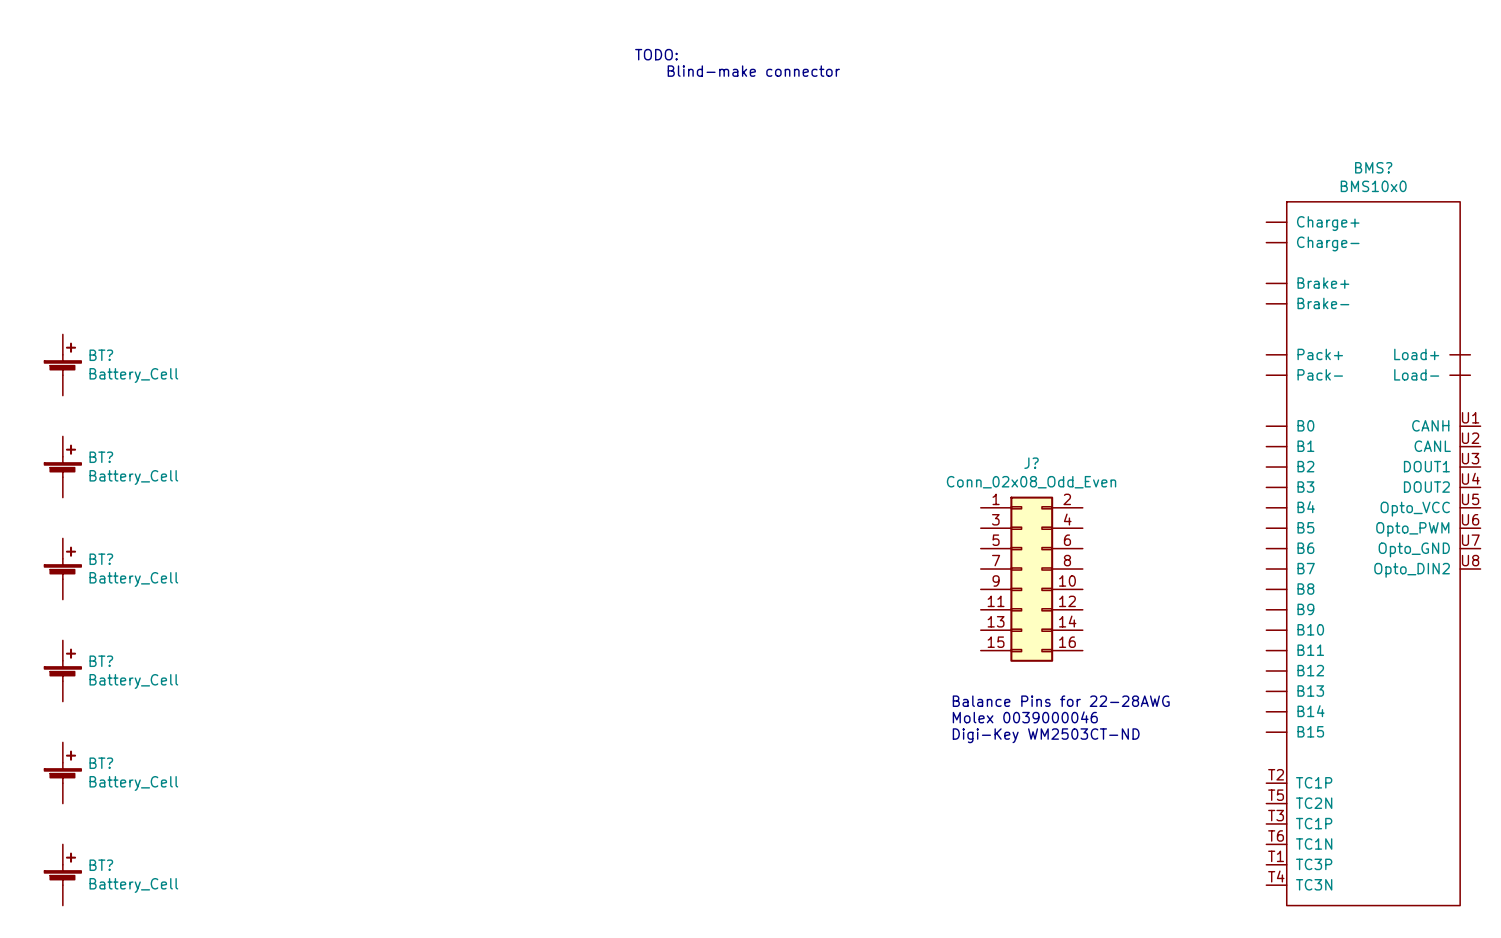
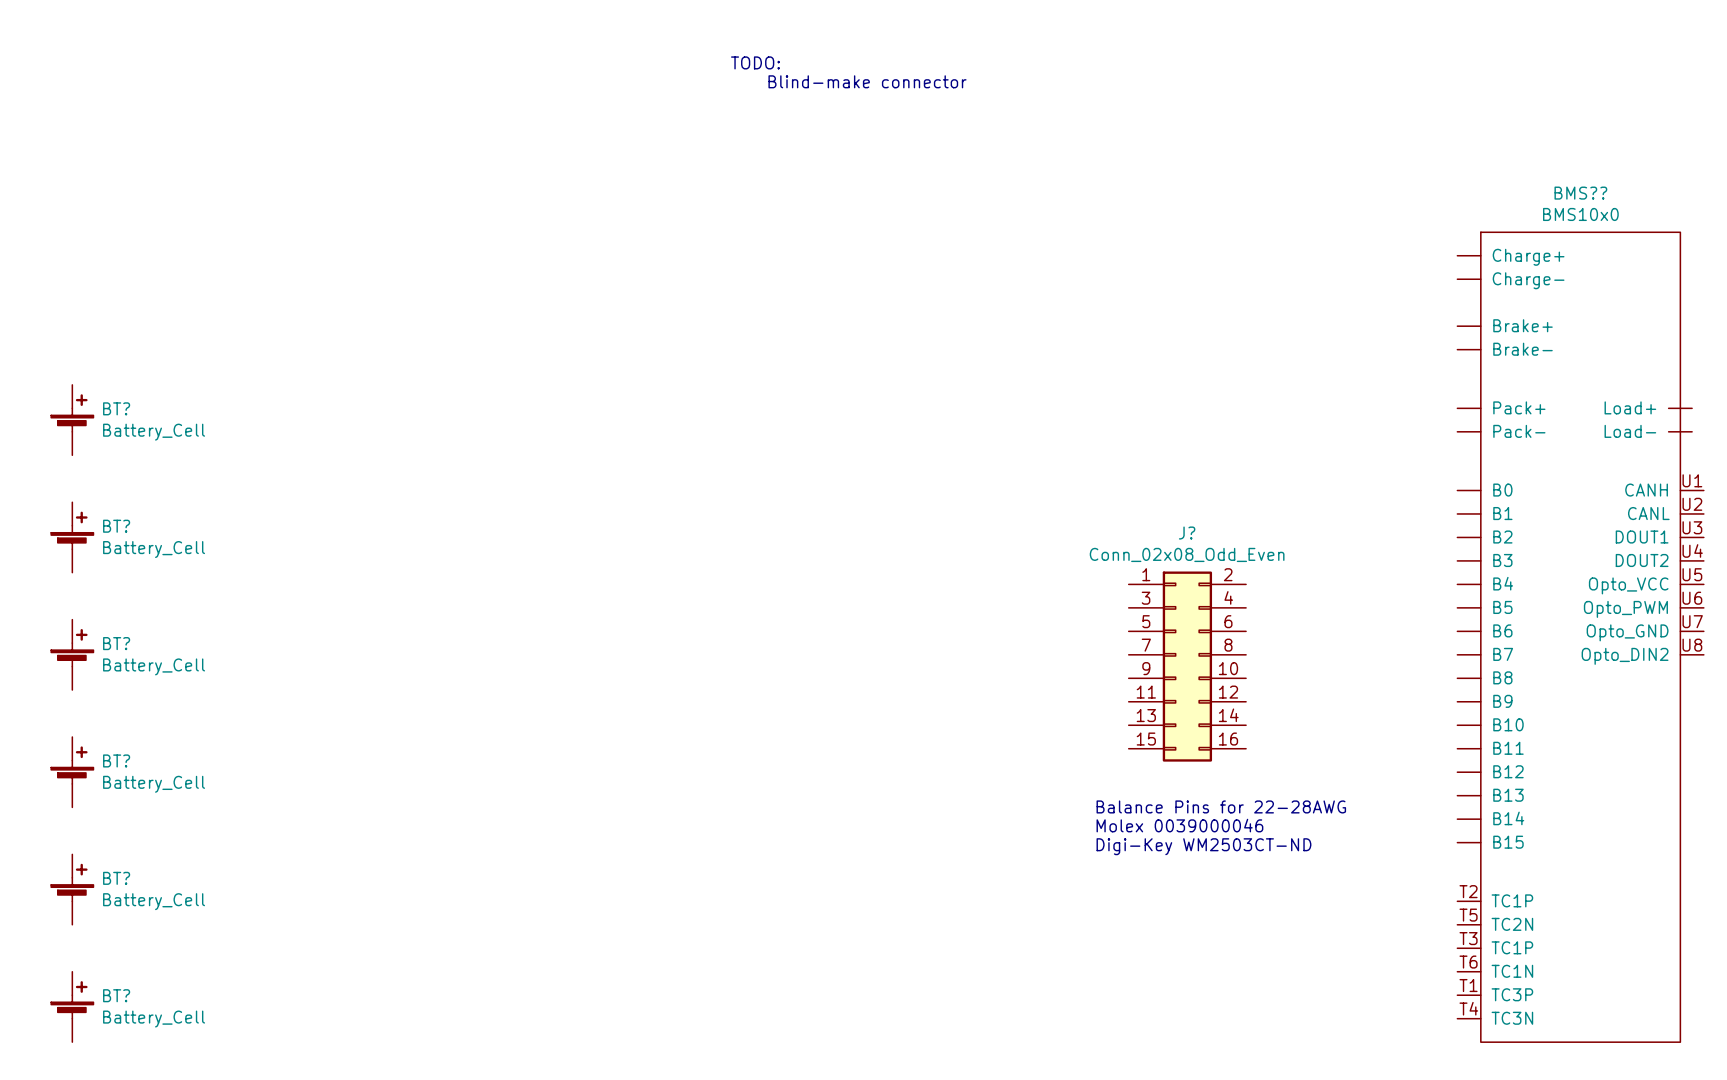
BMS? name: BMS? (1373, 167) -> BMS?? (1580, 193)

